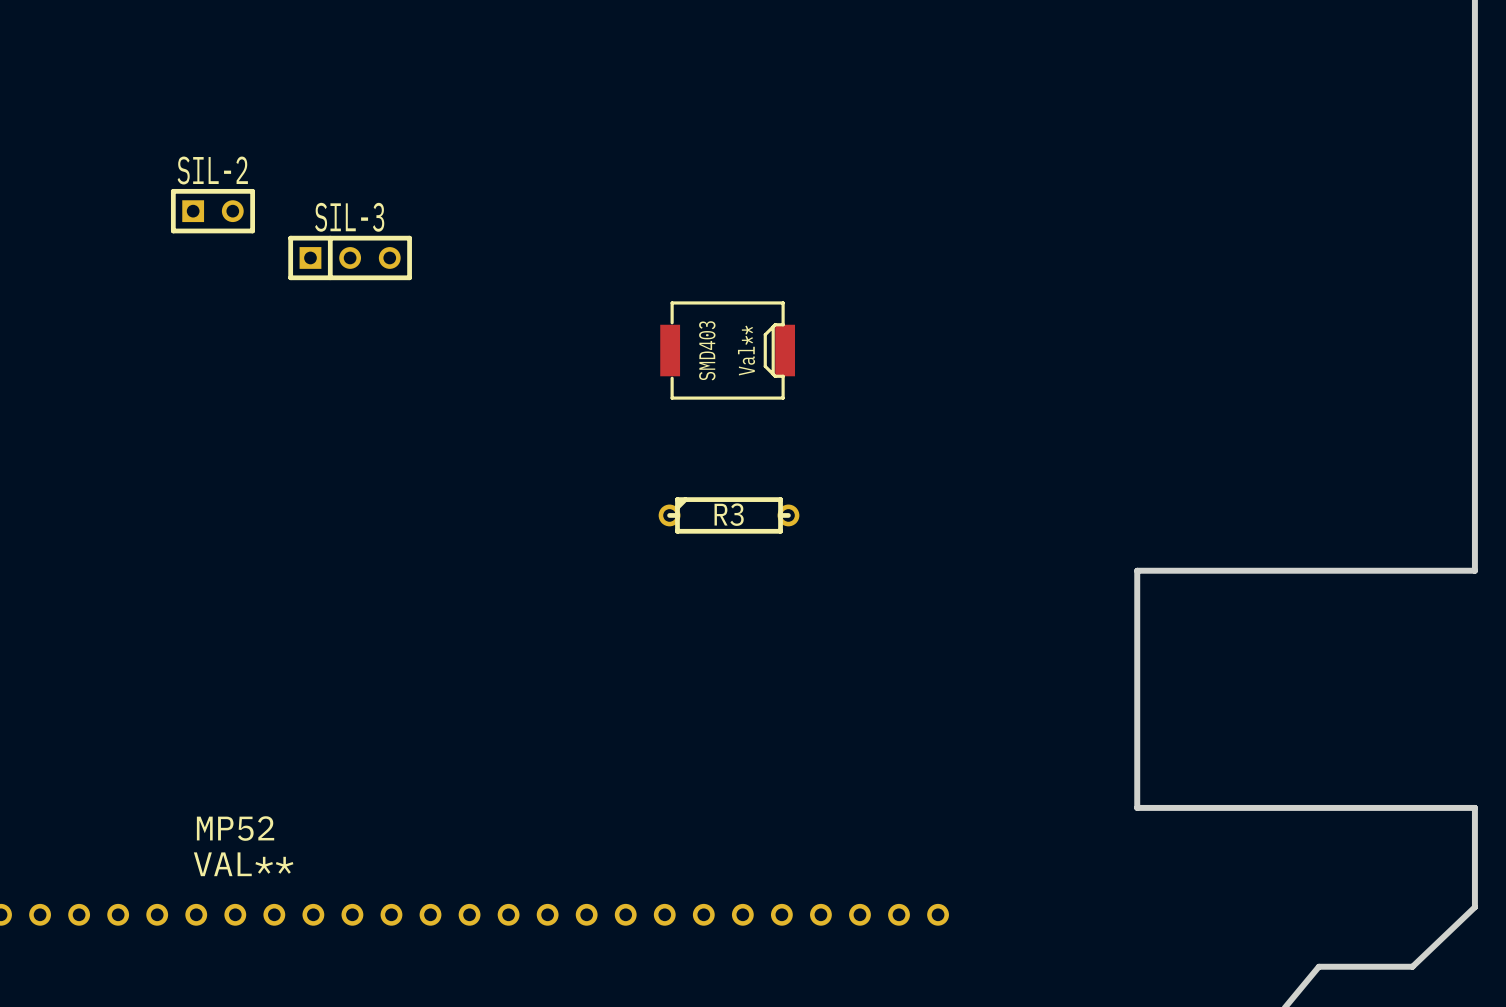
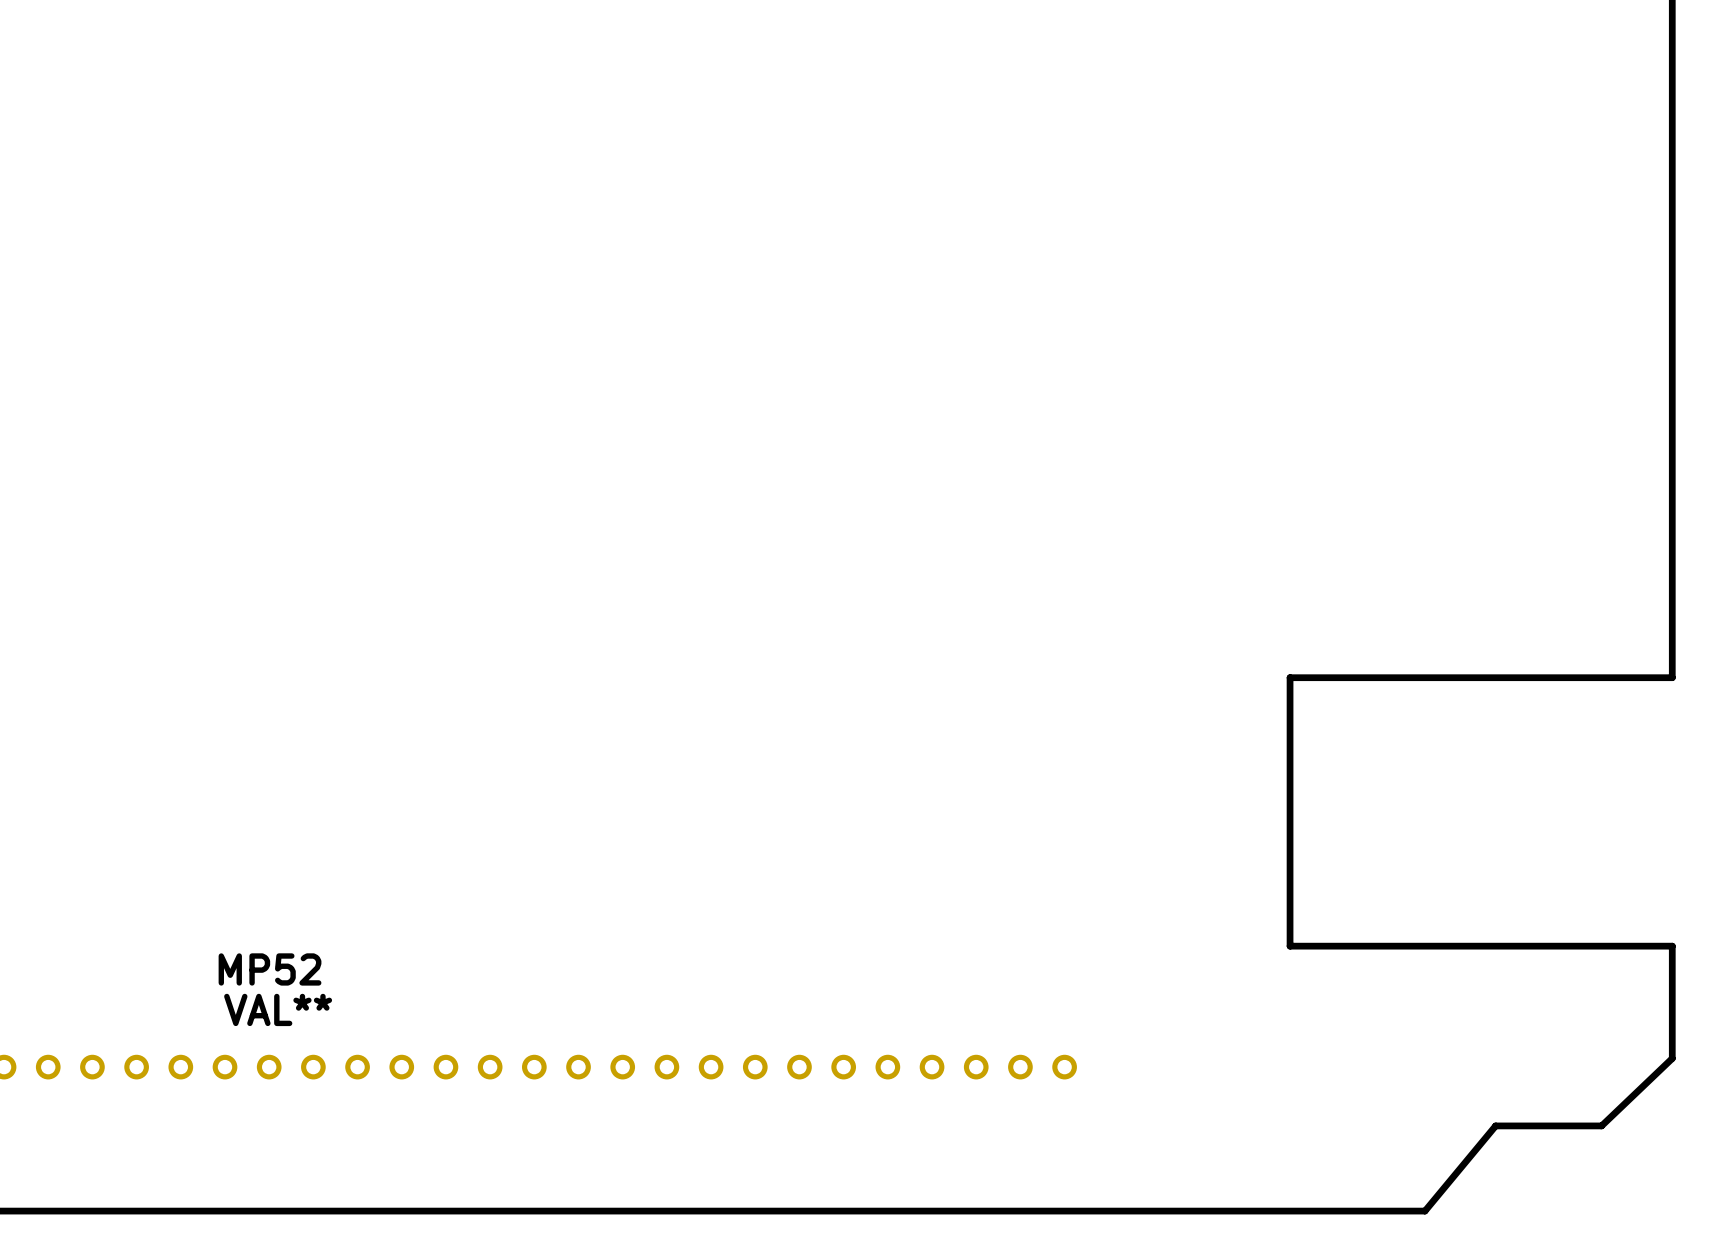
SIL-2: (212, 211) -> none
SIL-3: (350, 257) -> none
SMD403: Val** (727, 350) -> none
R3: (729, 515) -> none

